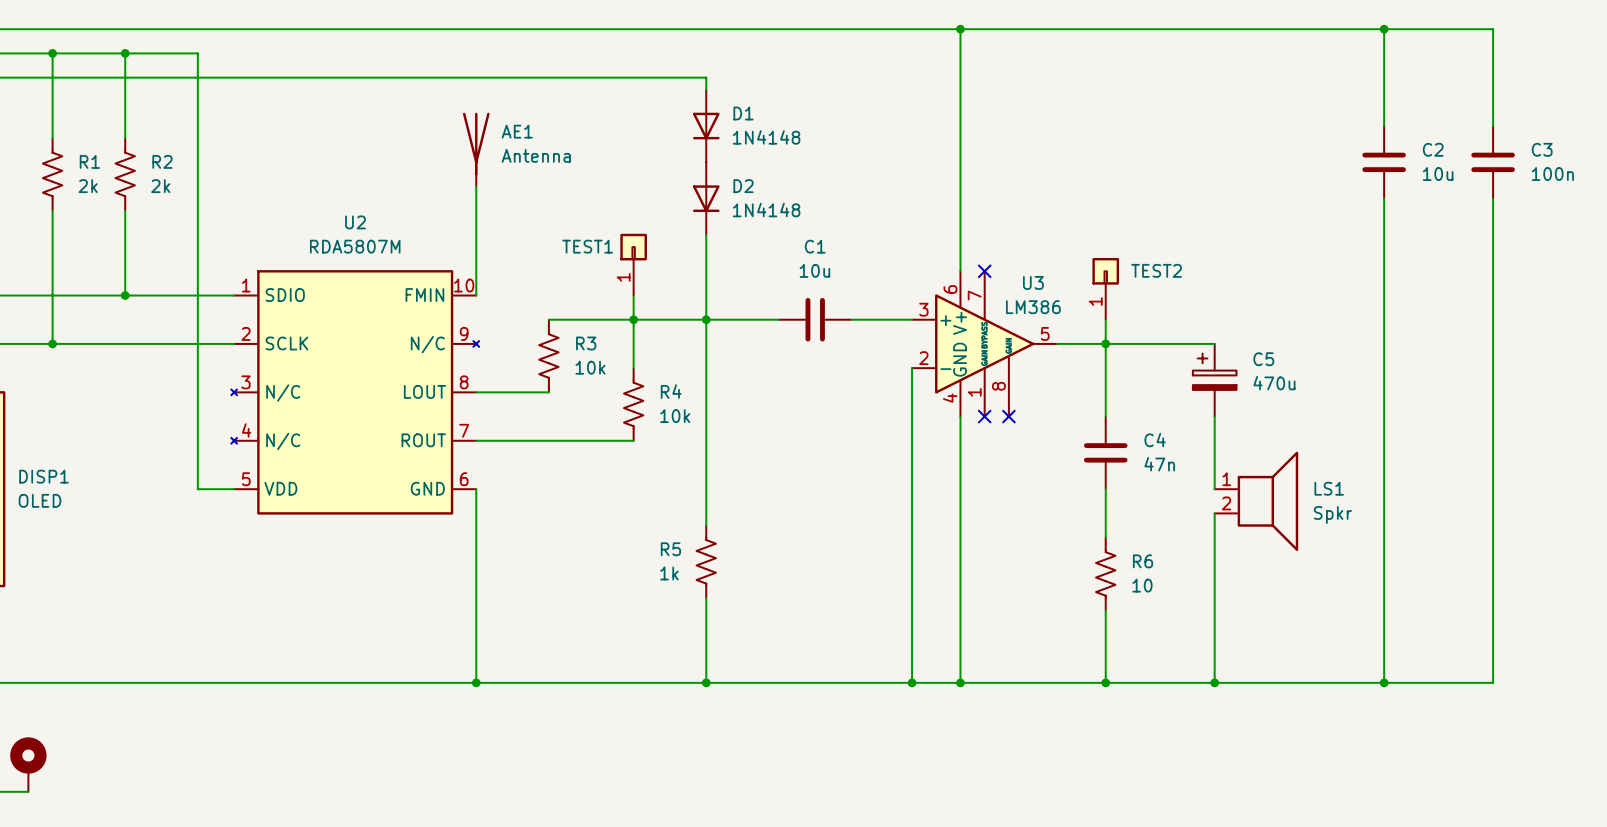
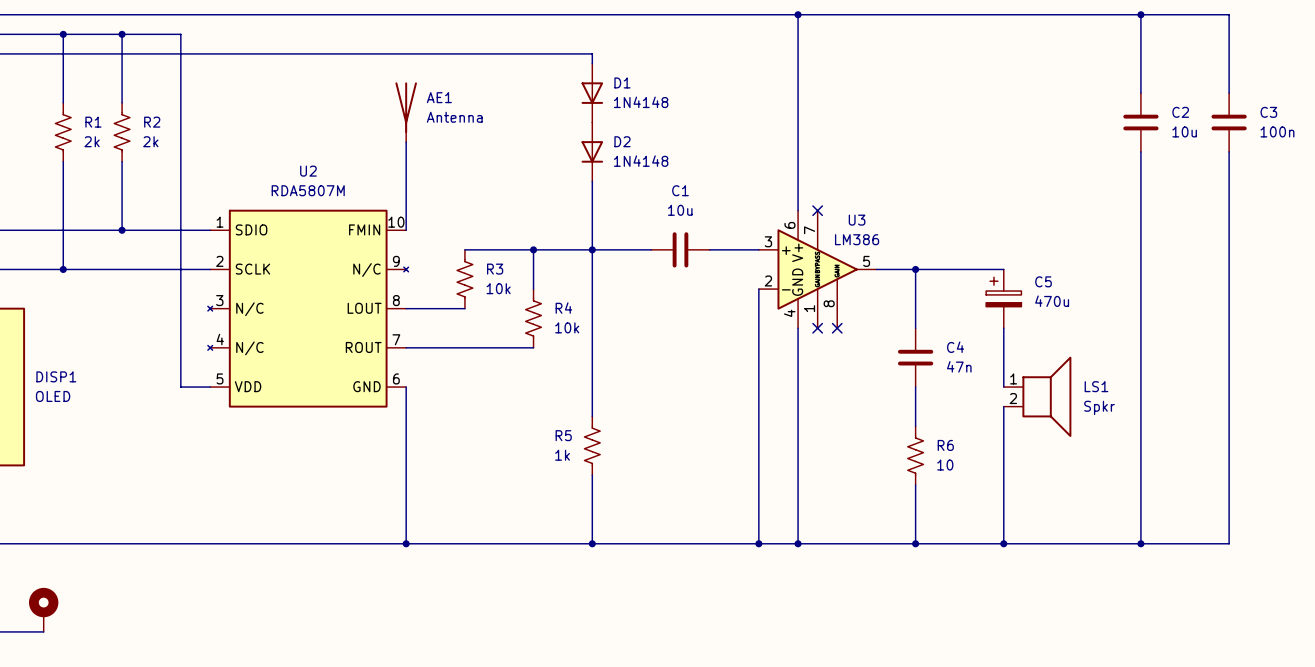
TEST1: (633, 264) -> none
TEST2: (1105, 288) -> none
wire: (633, 295) (633, 319) -> none
wire: (1105, 319) (1105, 343) -> none

